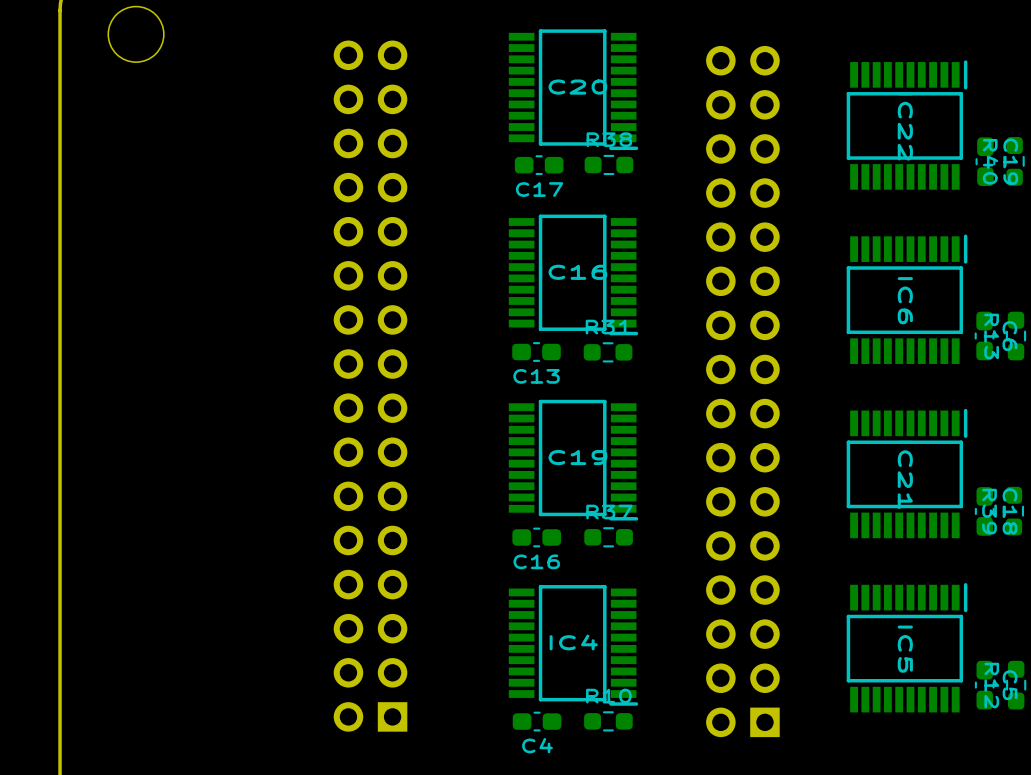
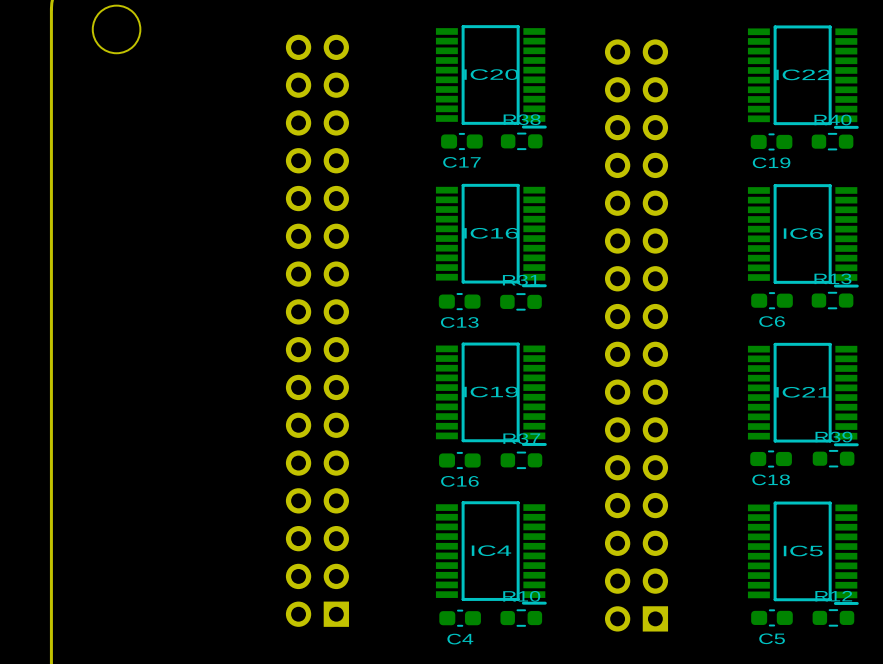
IC22 rotation: 0° (907, 125) -> 90° clockwise (803, 77)
C19 rotation: 0° (985, 161) -> 90° clockwise (771, 141)
C19 position: (985, 161) -> (771, 141)
R40 rotation: 0° (1014, 161) -> 90° clockwise (832, 141)
R40 position: (1014, 161) -> (832, 141)
IC6 rotation: 0° (907, 299) -> 90° clockwise (803, 235)
C6 rotation: 0° (984, 335) -> 90° clockwise (772, 300)
C6 position: (984, 335) -> (772, 300)
R13 rotation: 0° (1015, 336) -> 90° clockwise (832, 300)
R13 position: (1015, 336) -> (832, 300)
IC21 rotation: 0° (907, 473) -> 90° clockwise (803, 394)
C18 rotation: 0° (984, 511) -> 90° clockwise (771, 459)
C18 position: (984, 511) -> (771, 459)
R39 rotation: 0° (1013, 511) -> 90° clockwise (833, 458)
R39 position: (1013, 511) -> (833, 458)
IC5 rotation: 0° (907, 647) -> 90° clockwise (803, 553)
C5 rotation: 0° (984, 685) -> 90° clockwise (771, 617)
C5 position: (984, 685) -> (771, 617)
R12 rotation: 0° (1016, 685) -> 90° clockwise (833, 617)
R12 position: (1016, 685) -> (833, 617)

